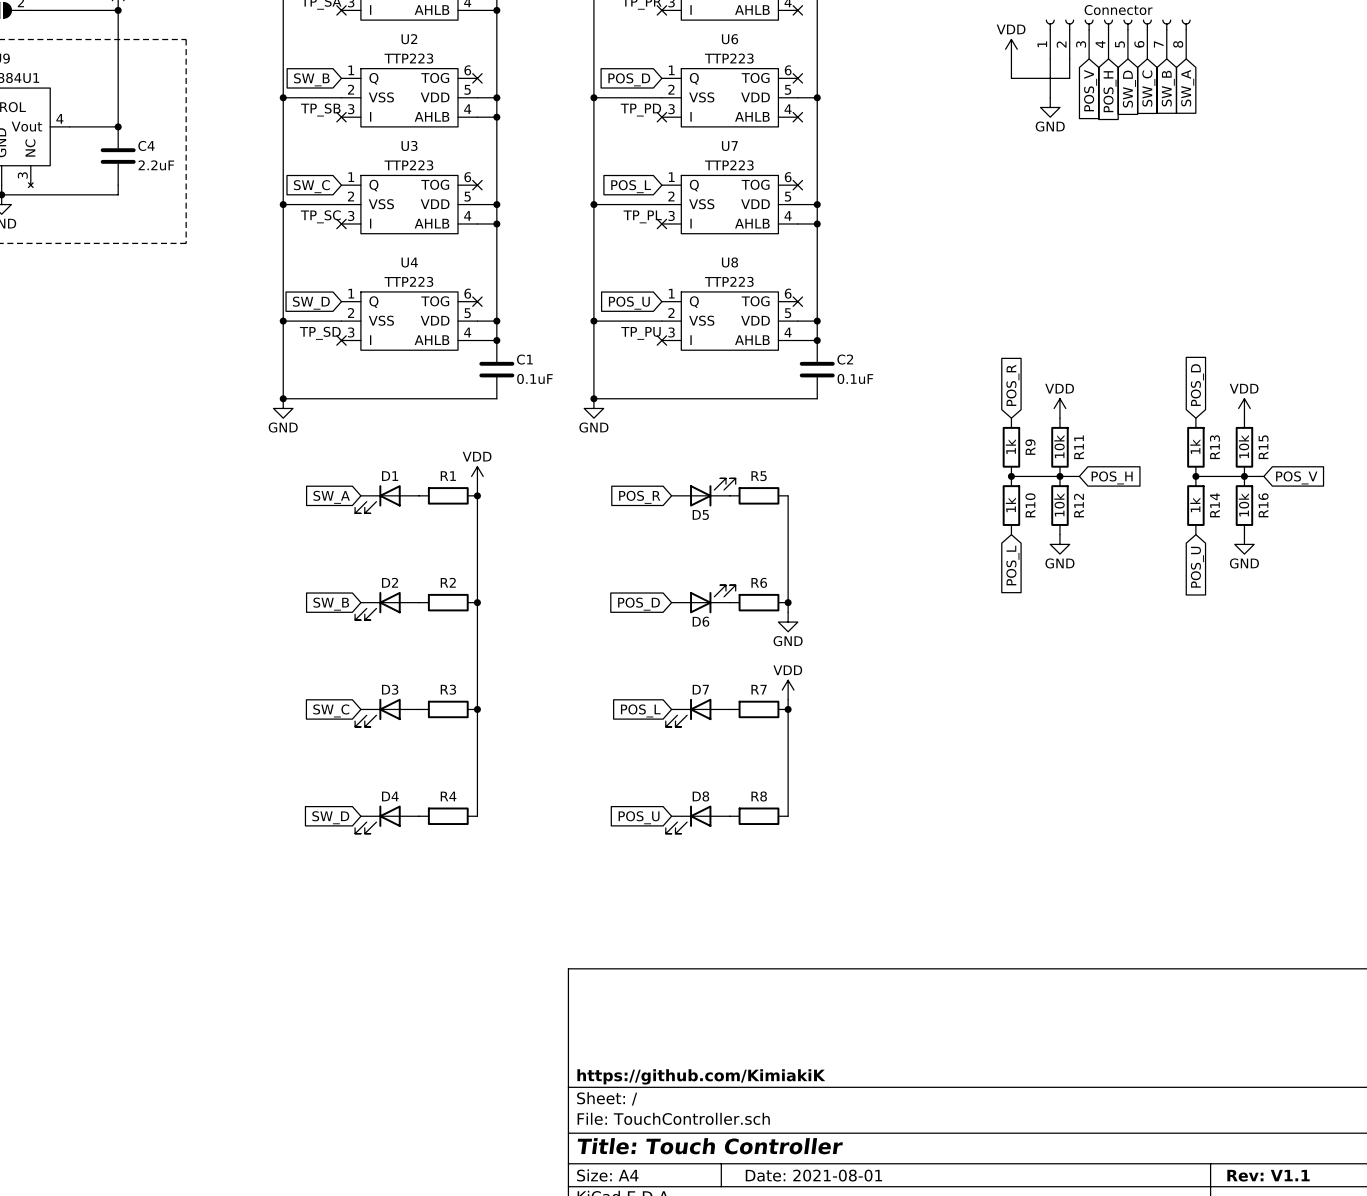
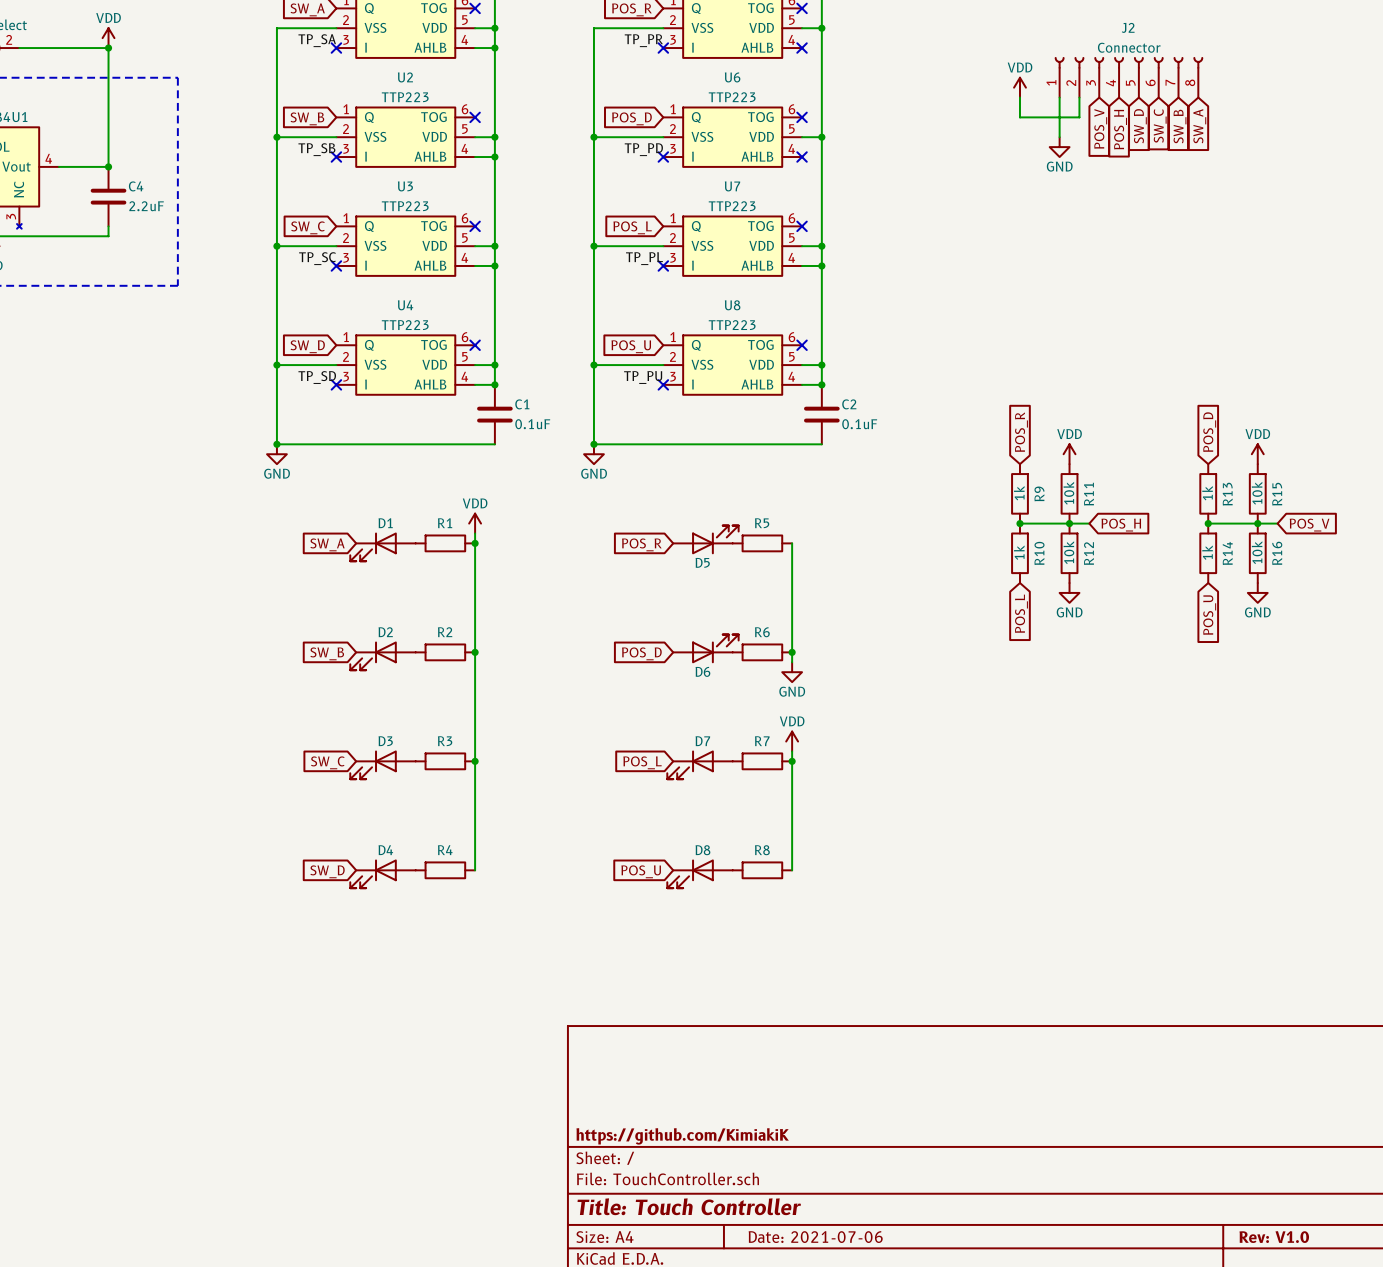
title block: Date: 2021-08-01 (813, 1175) -> Date: 2021-07-06 (815, 1237)
title block: Rev: V1.1 (1268, 1175) -> Rev: V1.0 (1274, 1237)

